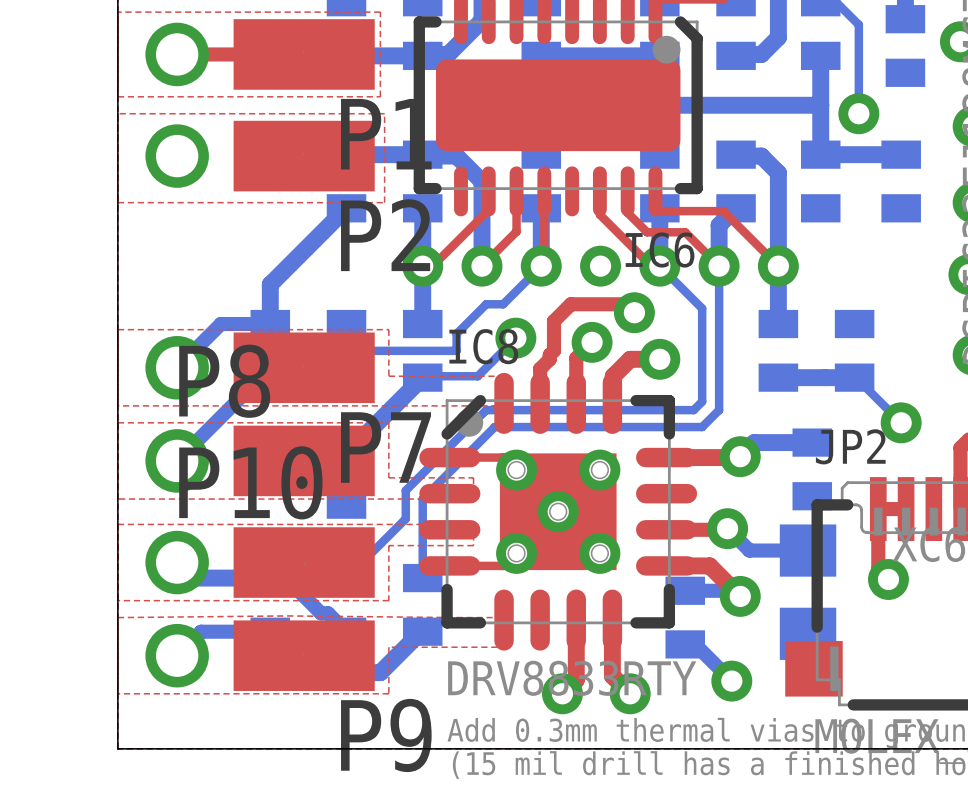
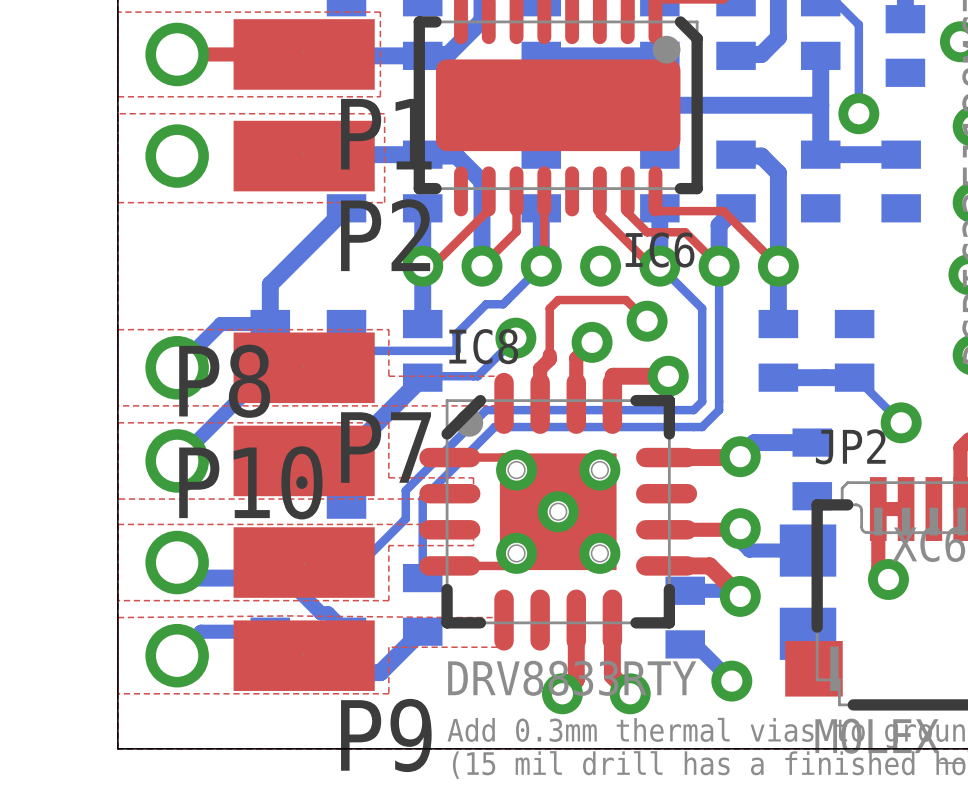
top track: (634, 312) (625, 304) (570, 304) (553, 321) (553, 350) (549, 355) -> (647, 321) (625, 300) (558, 300) (549, 308) (549, 355)
via position: (634, 312) -> (647, 321)
top track: (659, 359) (630, 359) (613, 376) -> (668, 376) (613, 376)
via position: (659, 359) -> (668, 376)
via position: (727, 528) -> (740, 528)

